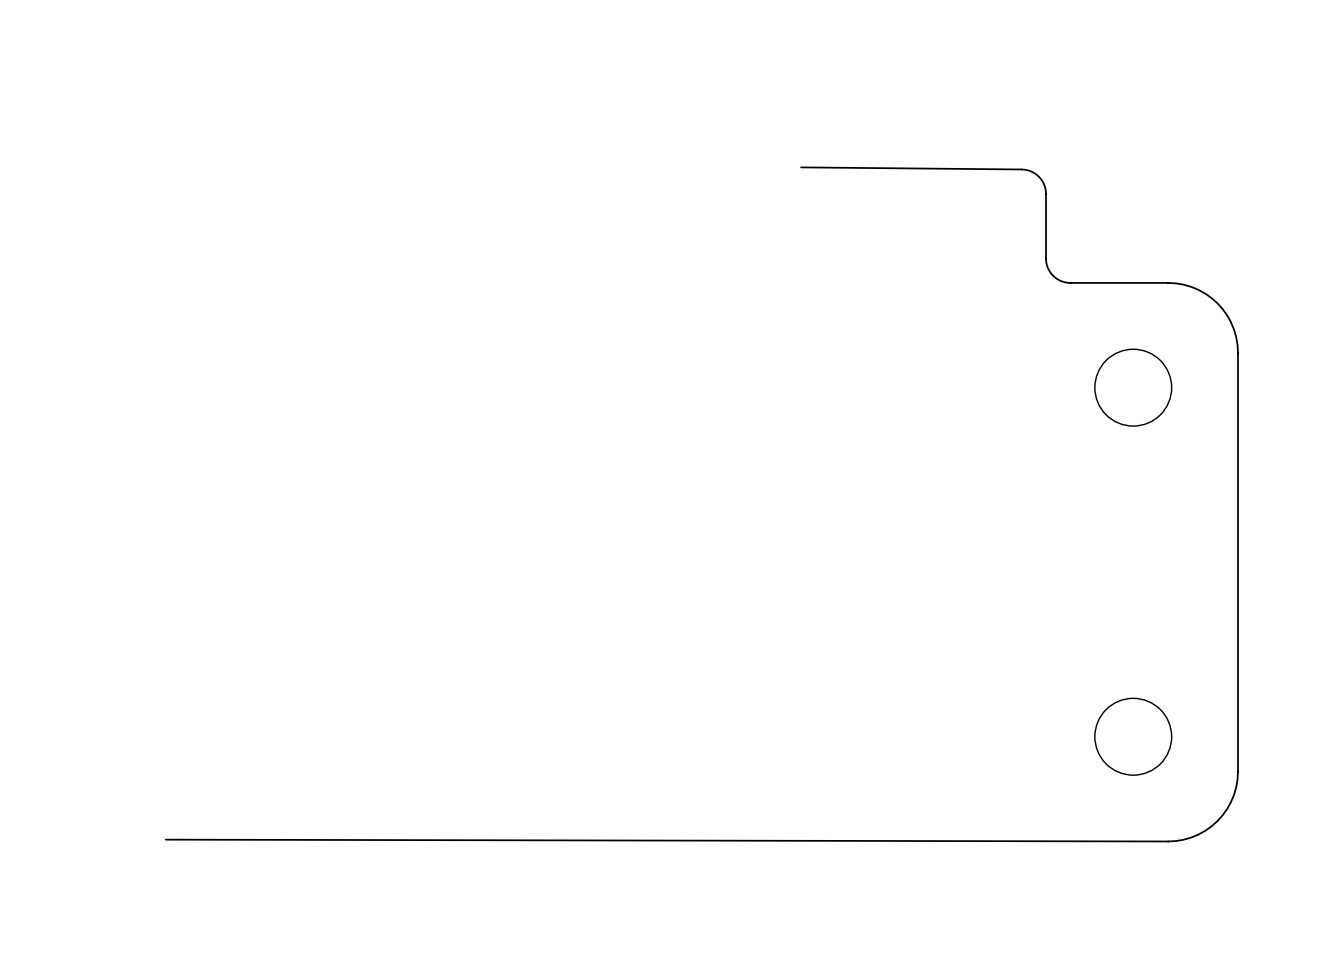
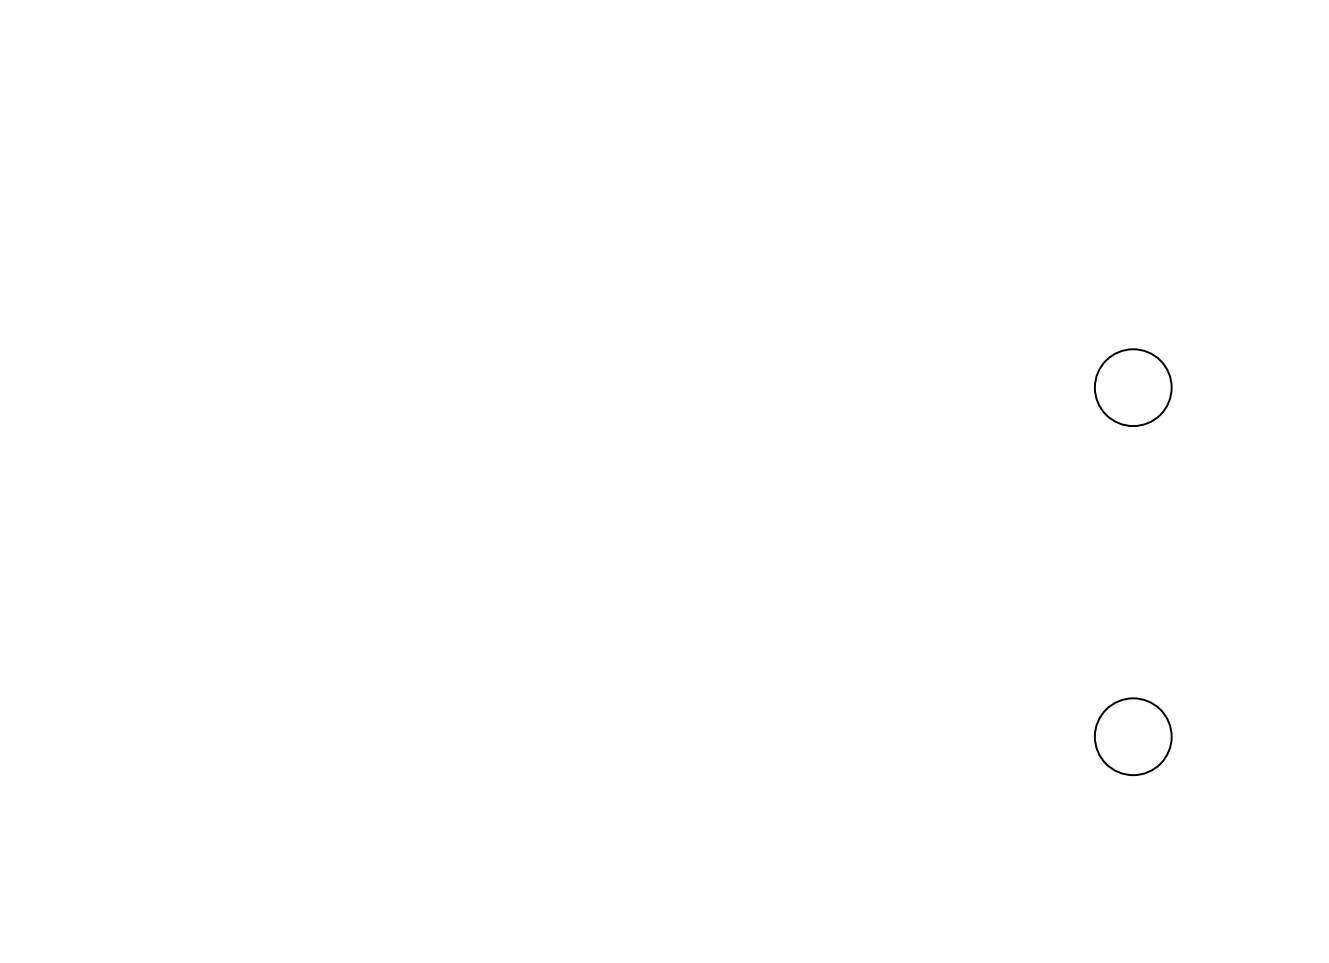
board edge: (801, 167) (1029, 170) (1040, 178) (1045, 188) (1046, 261) (1048, 269) (1055, 277) (1070, 282) (1168, 282) (1183, 284) (1205, 293) (1217, 303) (1227, 315) (1236, 337) (1237, 352) (1237, 771) (1236, 787) (1231, 801) (1217, 821) (1205, 830) (1191, 837) (1168, 841) (165, 839) -> none

